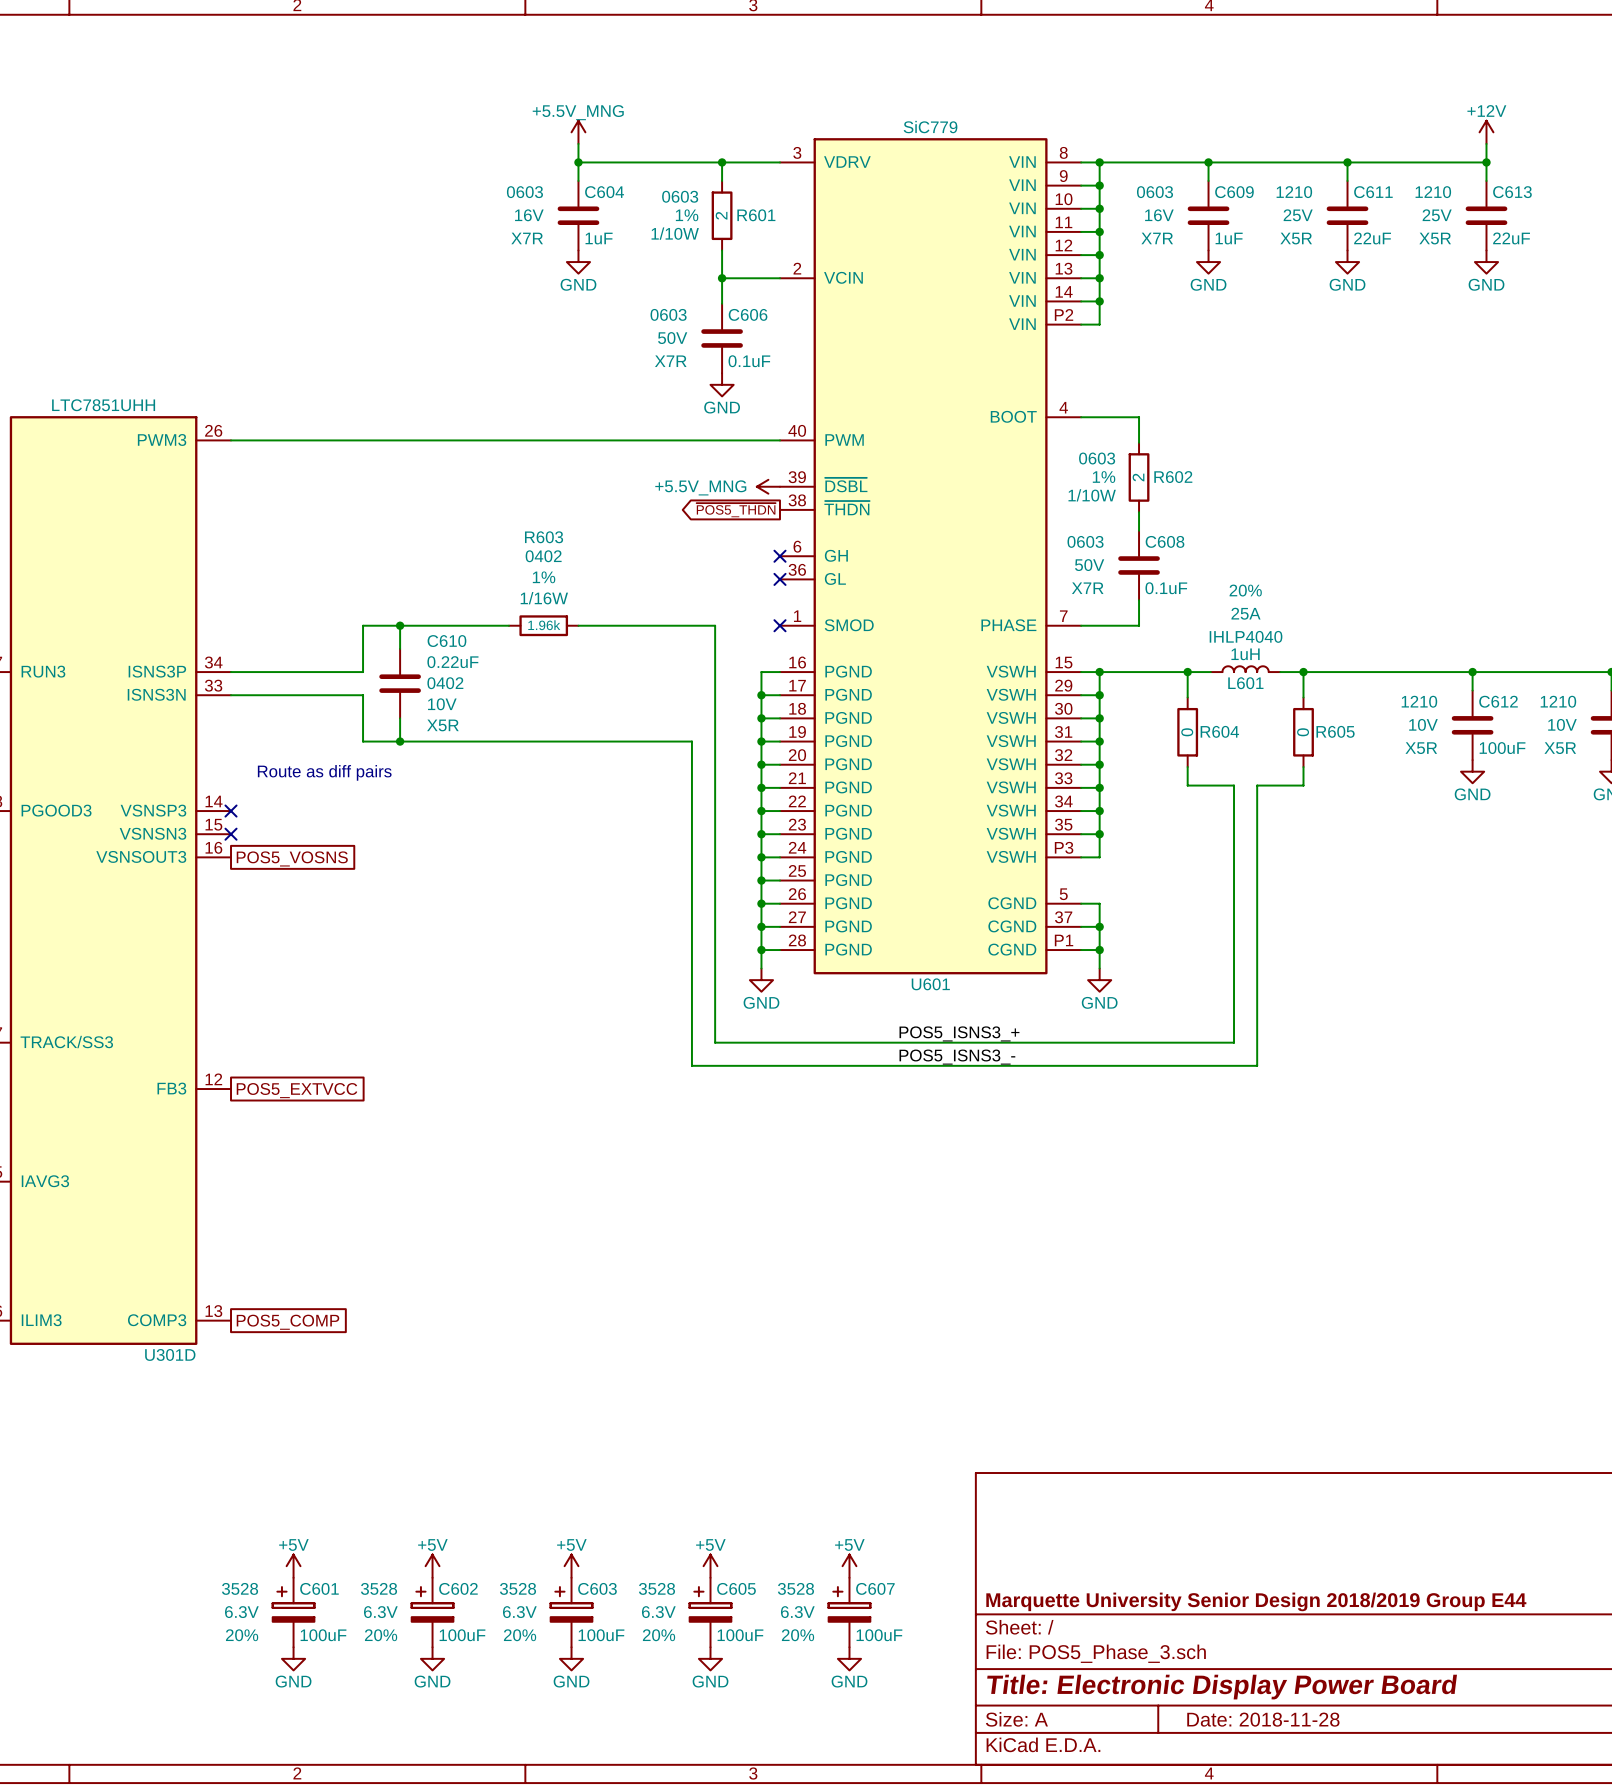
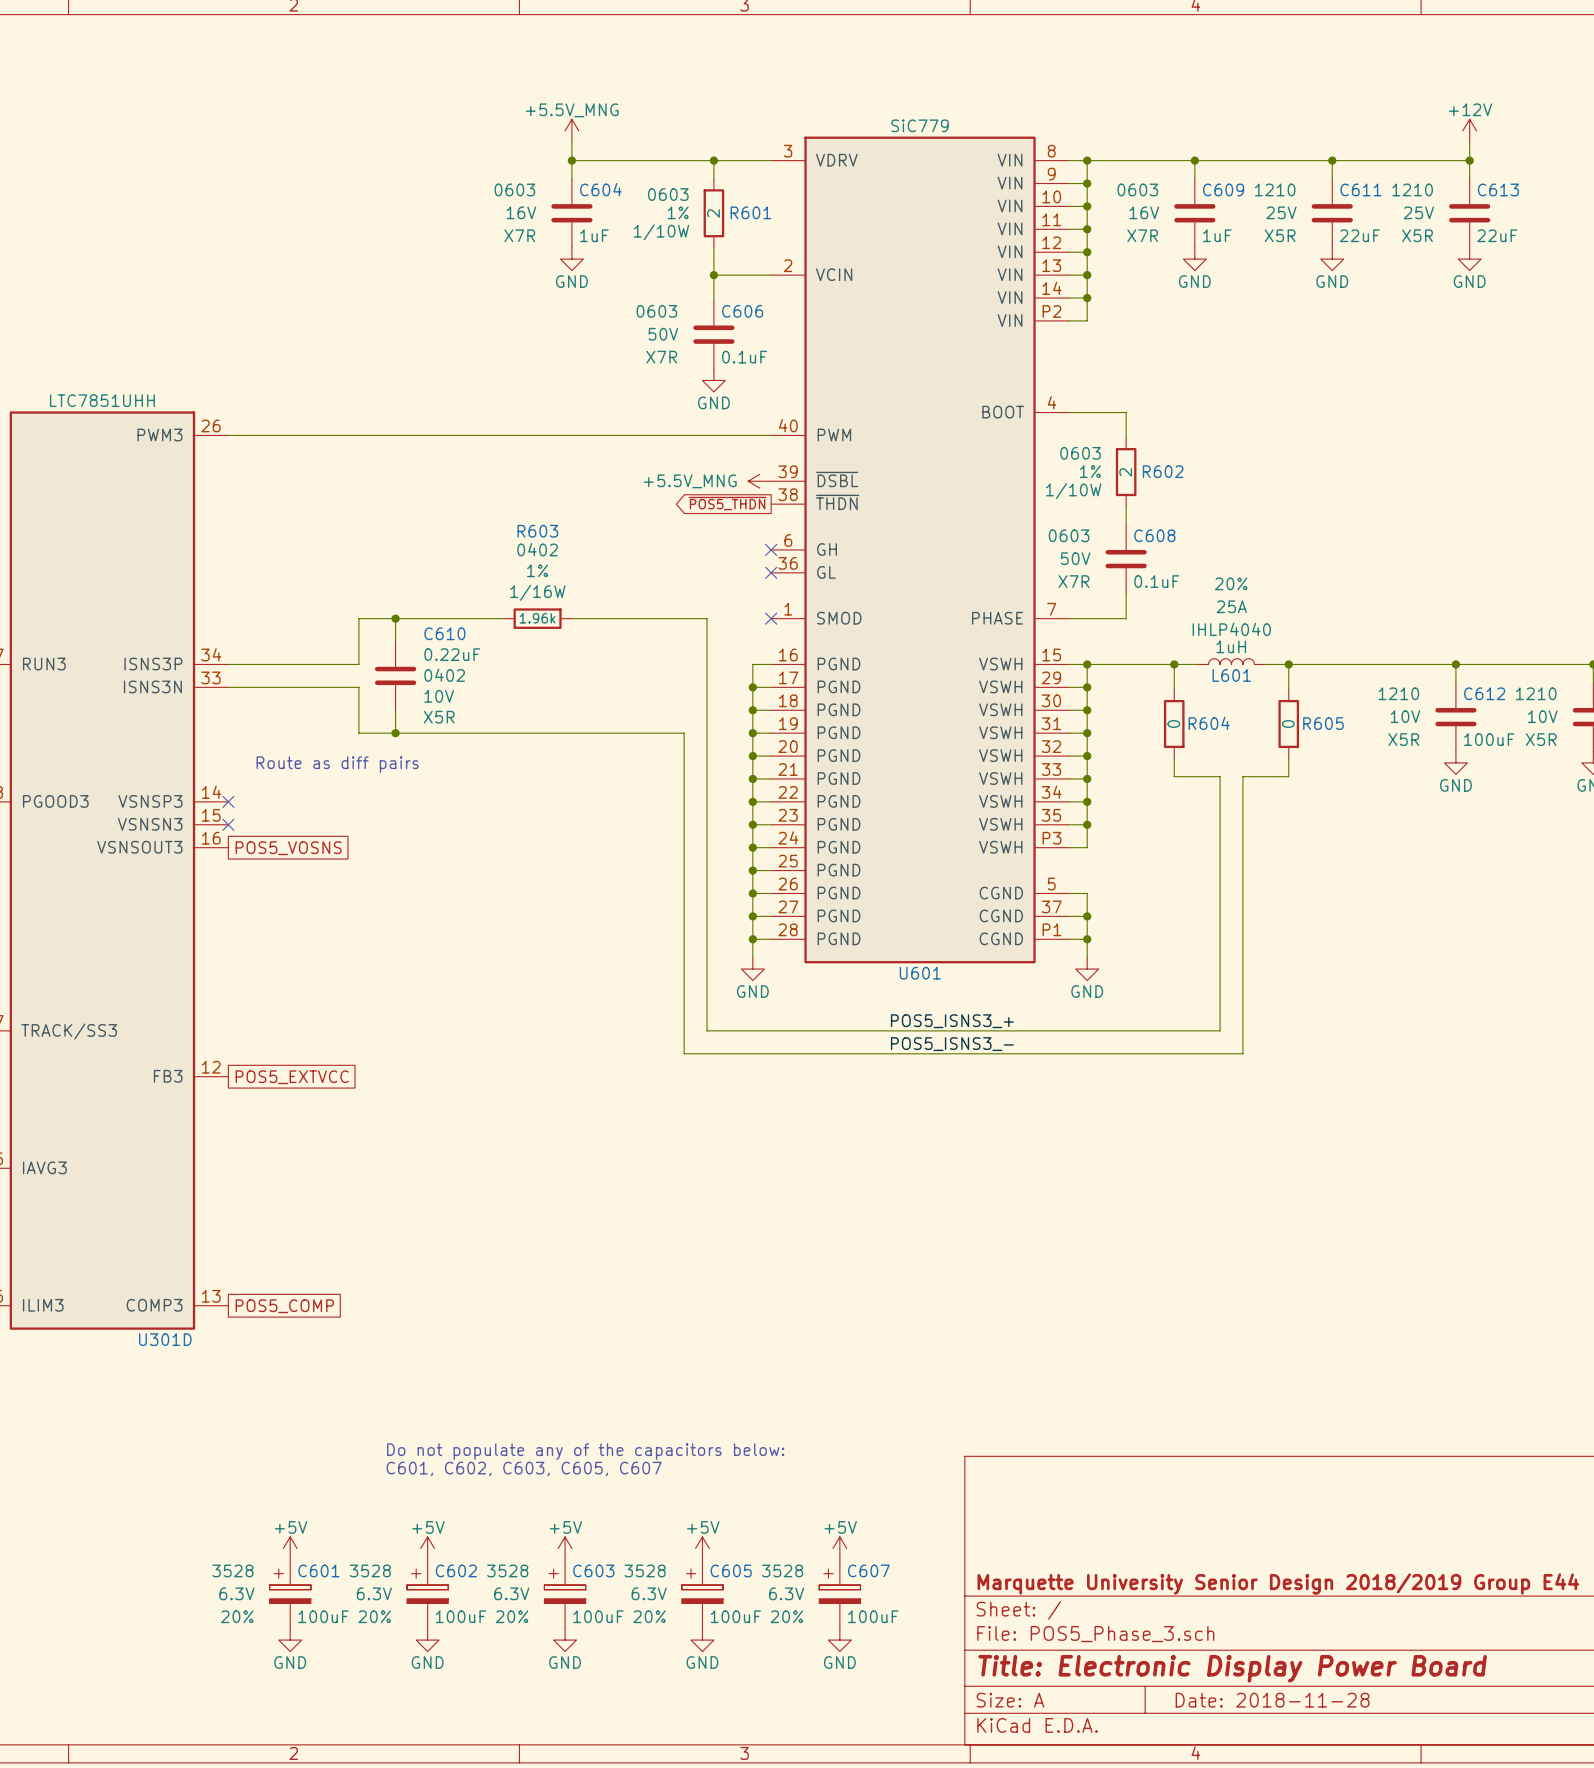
text: none -> Do not populate any of the capacitors below: (585, 1451)
text: none -> C601, C602, C603, C605, C607 (524, 1468)

